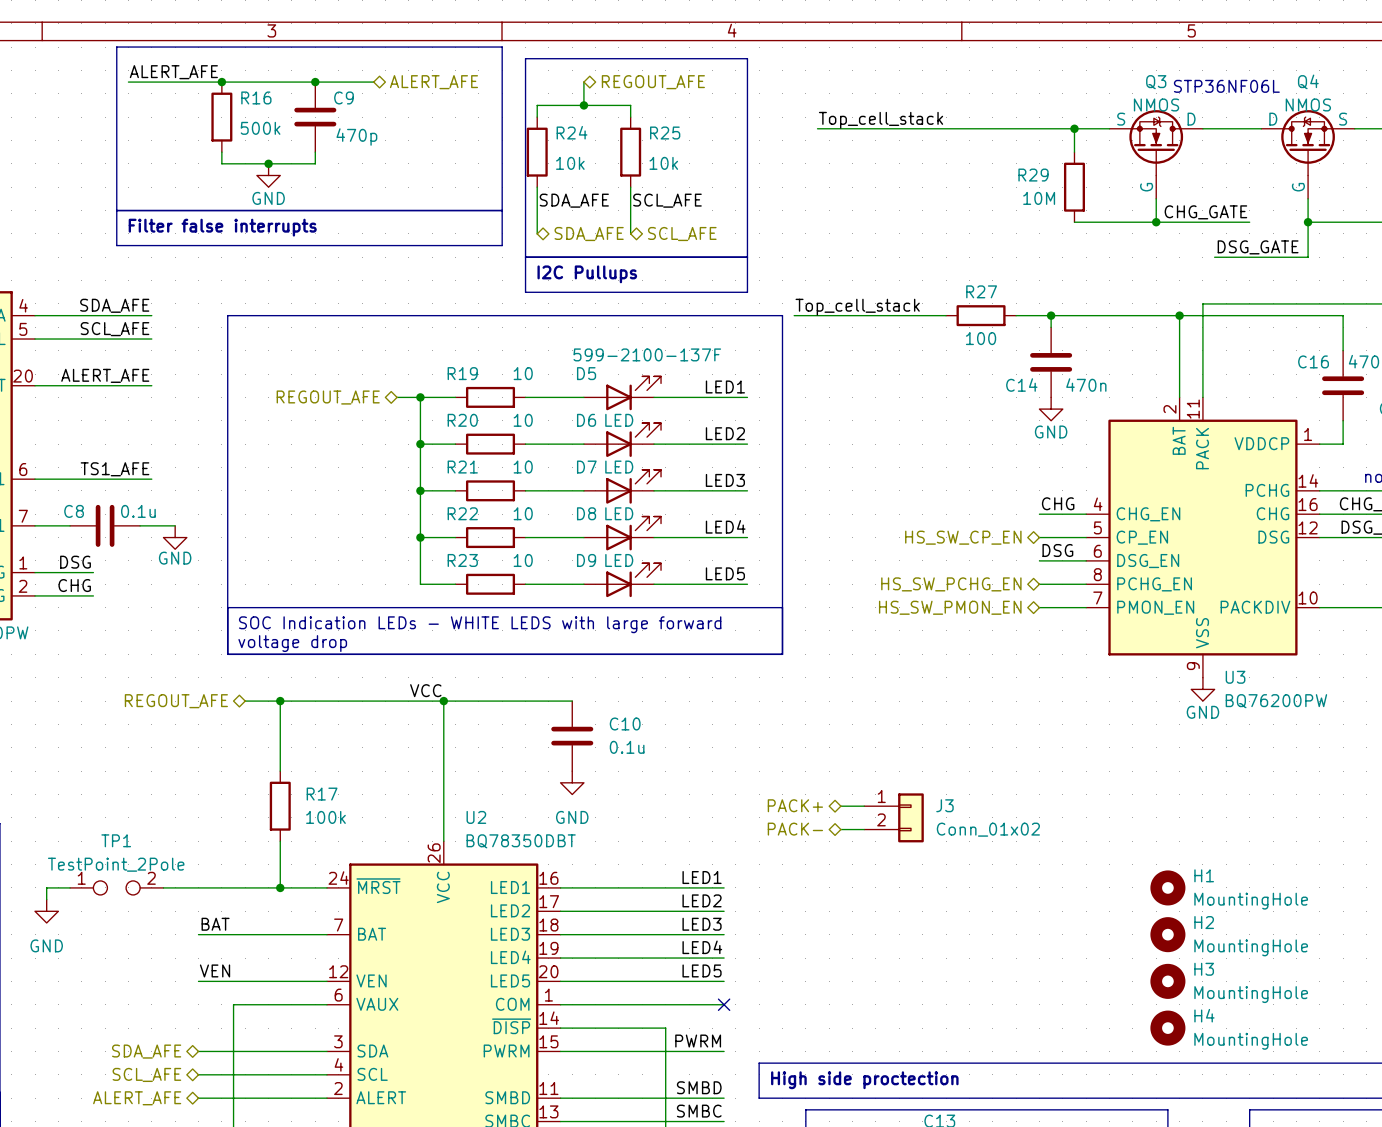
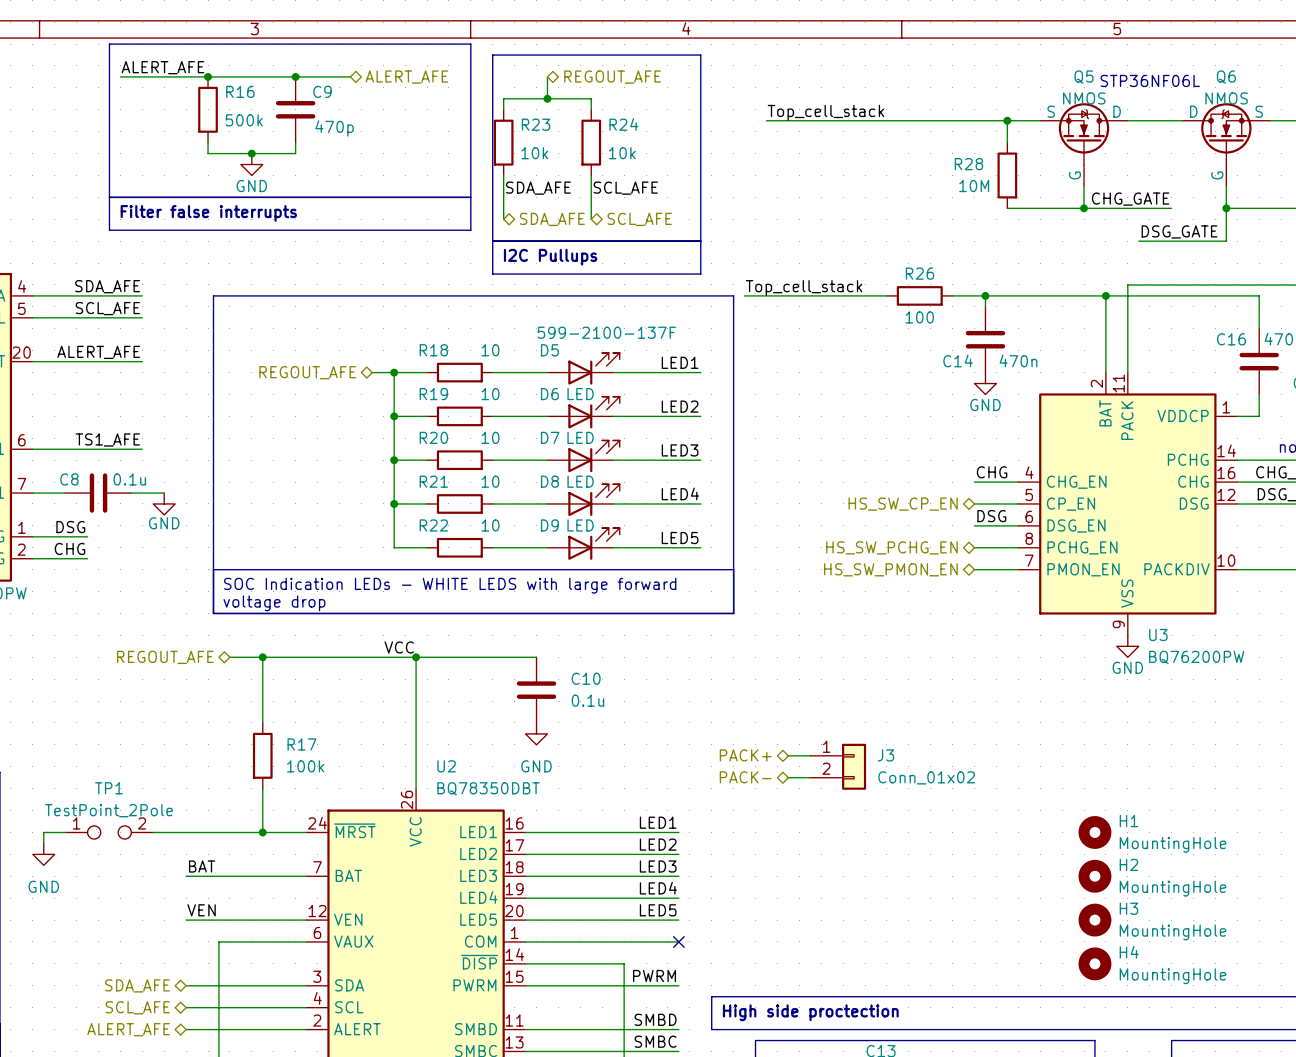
Q4 name: Q4 (1308, 81) -> Q6 (1226, 77)
Q3 name: Q3 (1156, 82) -> Q5 (1084, 77)
R24 name: R24 (572, 132) -> R23 (536, 124)
R25 name: R25 (665, 133) -> R24 (623, 124)
R29 name: R29 (1033, 175) -> R28 (968, 164)
R27 name: R27 (981, 291) -> R26 (920, 273)
R19 name: R19 (462, 373) -> R18 (433, 350)
R20 name: R20 (462, 420) -> R19 (433, 394)
R21 name: R21 (462, 467) -> R20 (433, 437)
R22 name: R22 (462, 513) -> R21 (433, 481)
R23 name: R23 (462, 560) -> R22 (433, 525)

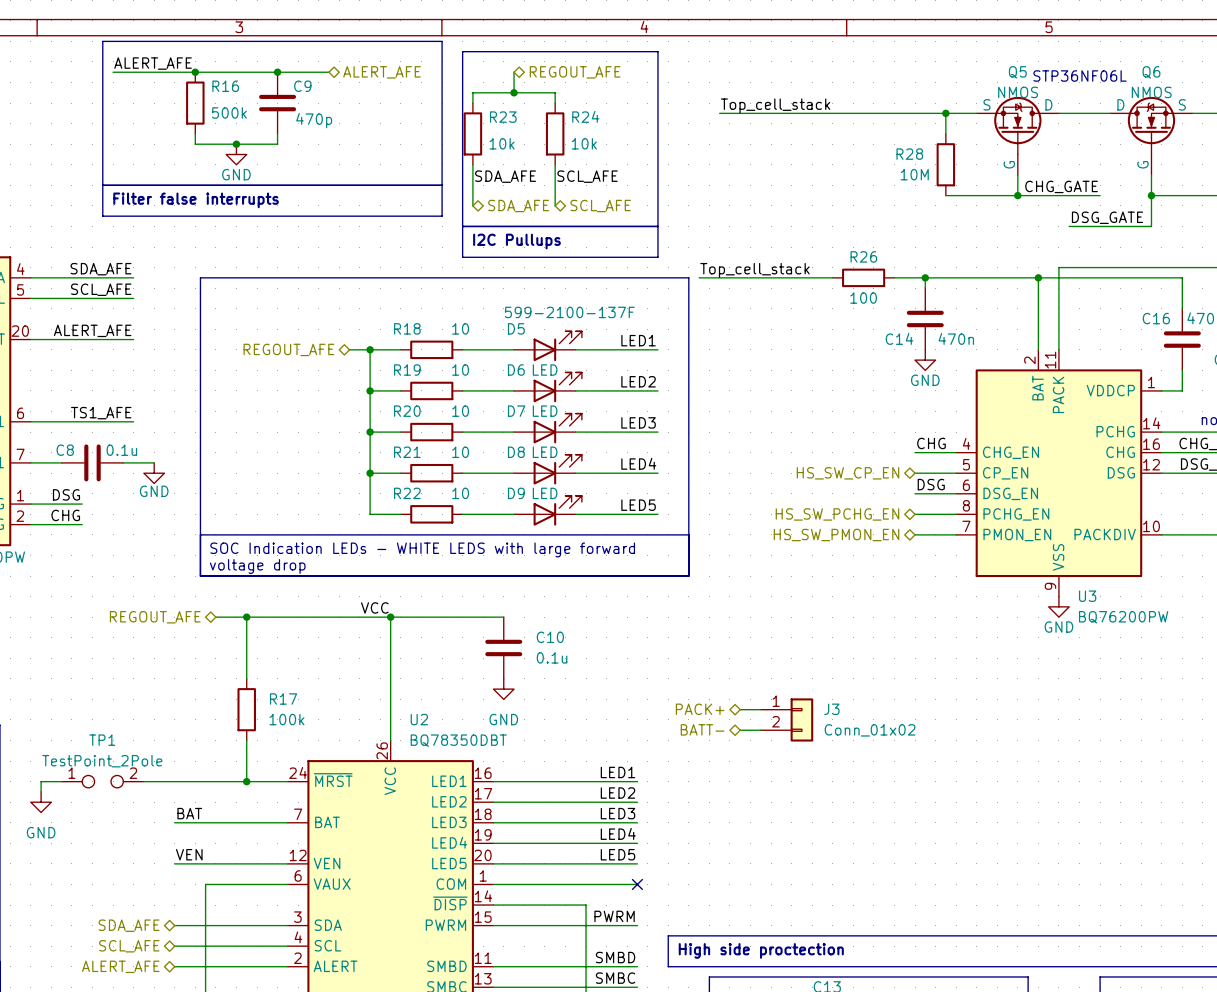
hierarchical label: PACK- (745, 777) -> BATT- (702, 729)
H1: MountingHole (1094, 832) -> none
H2: MountingHole (1094, 876) -> none
H3: MountingHole (1094, 920) -> none
H4: MountingHole (1094, 963) -> none

